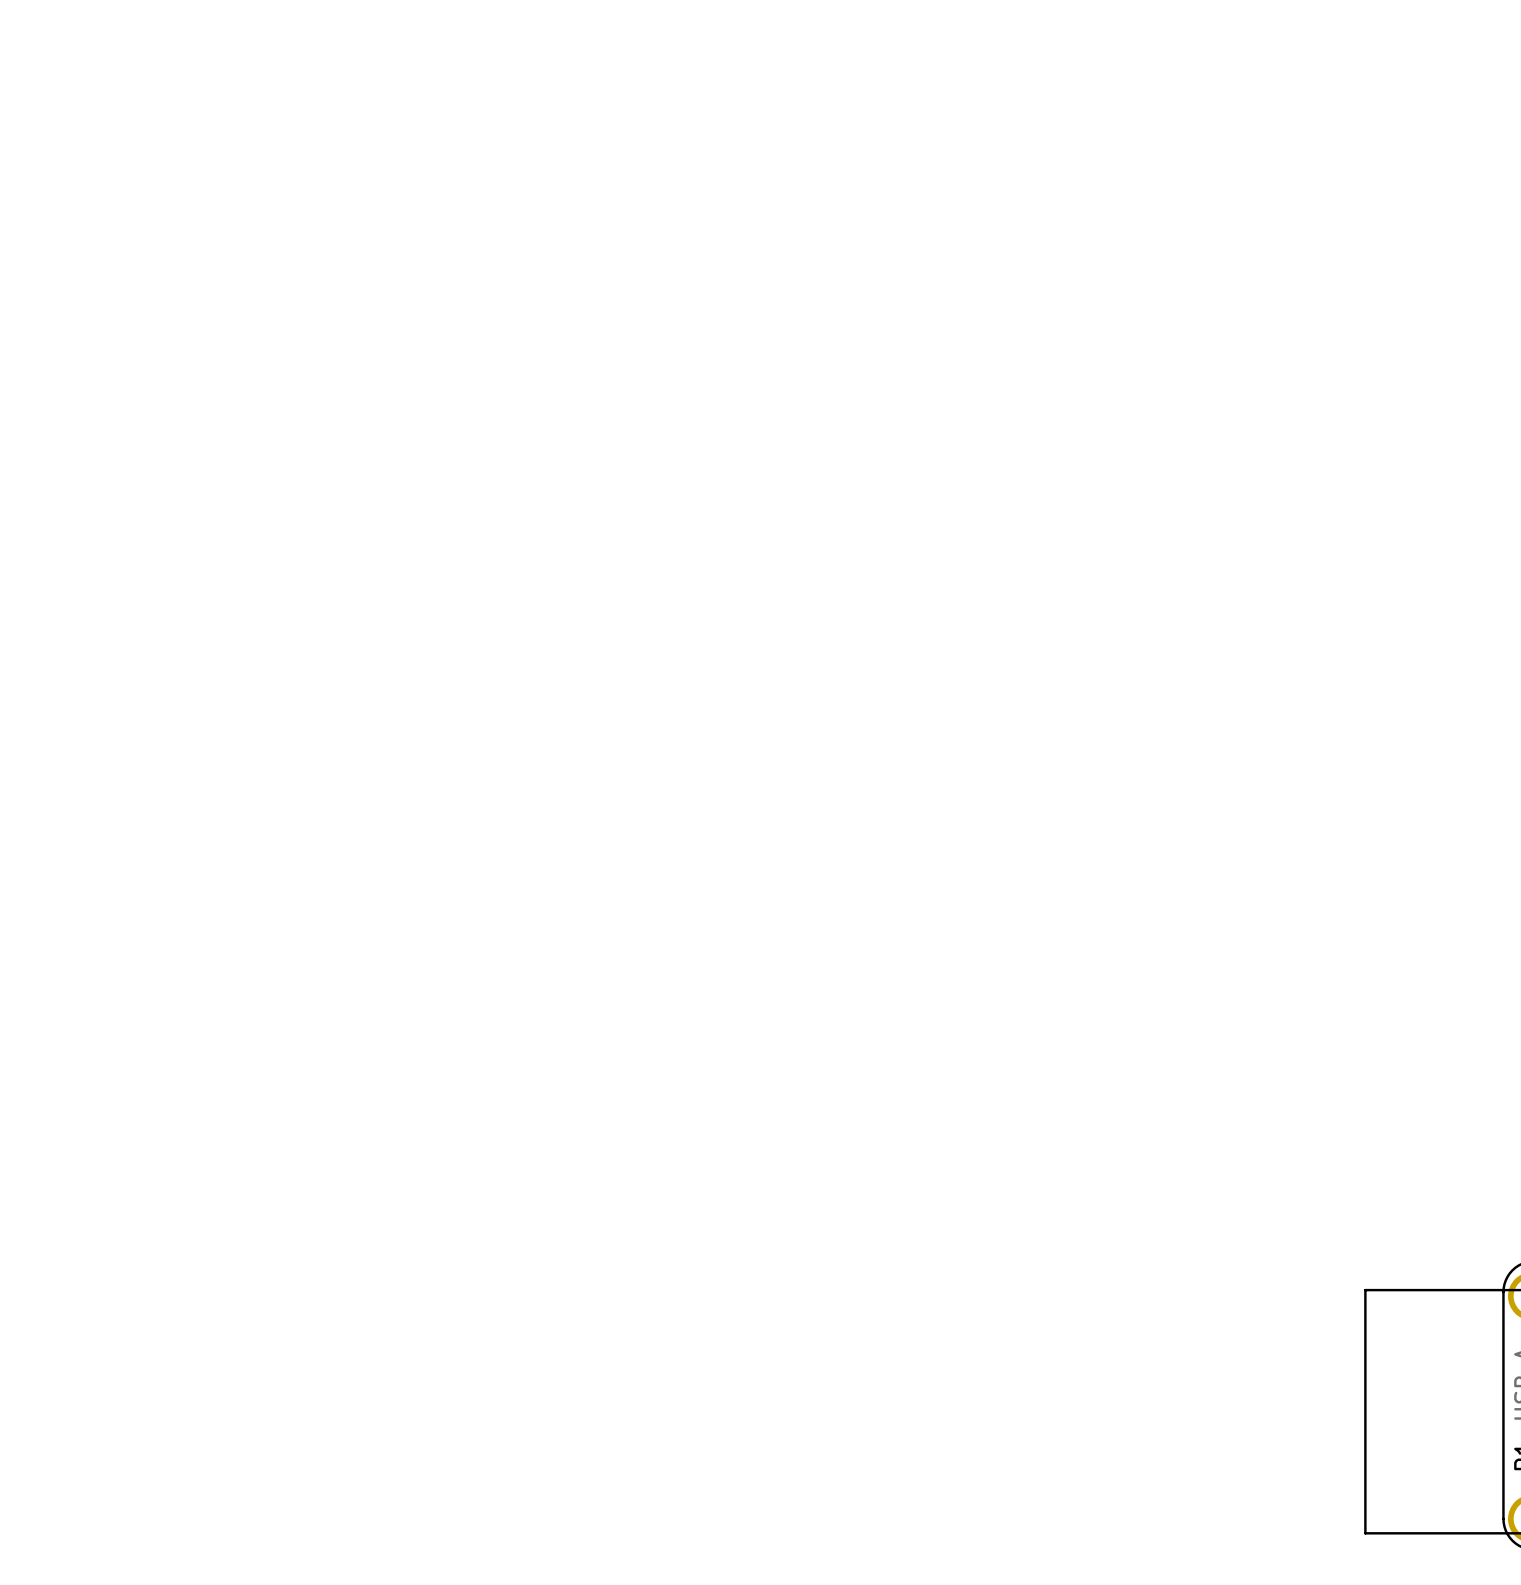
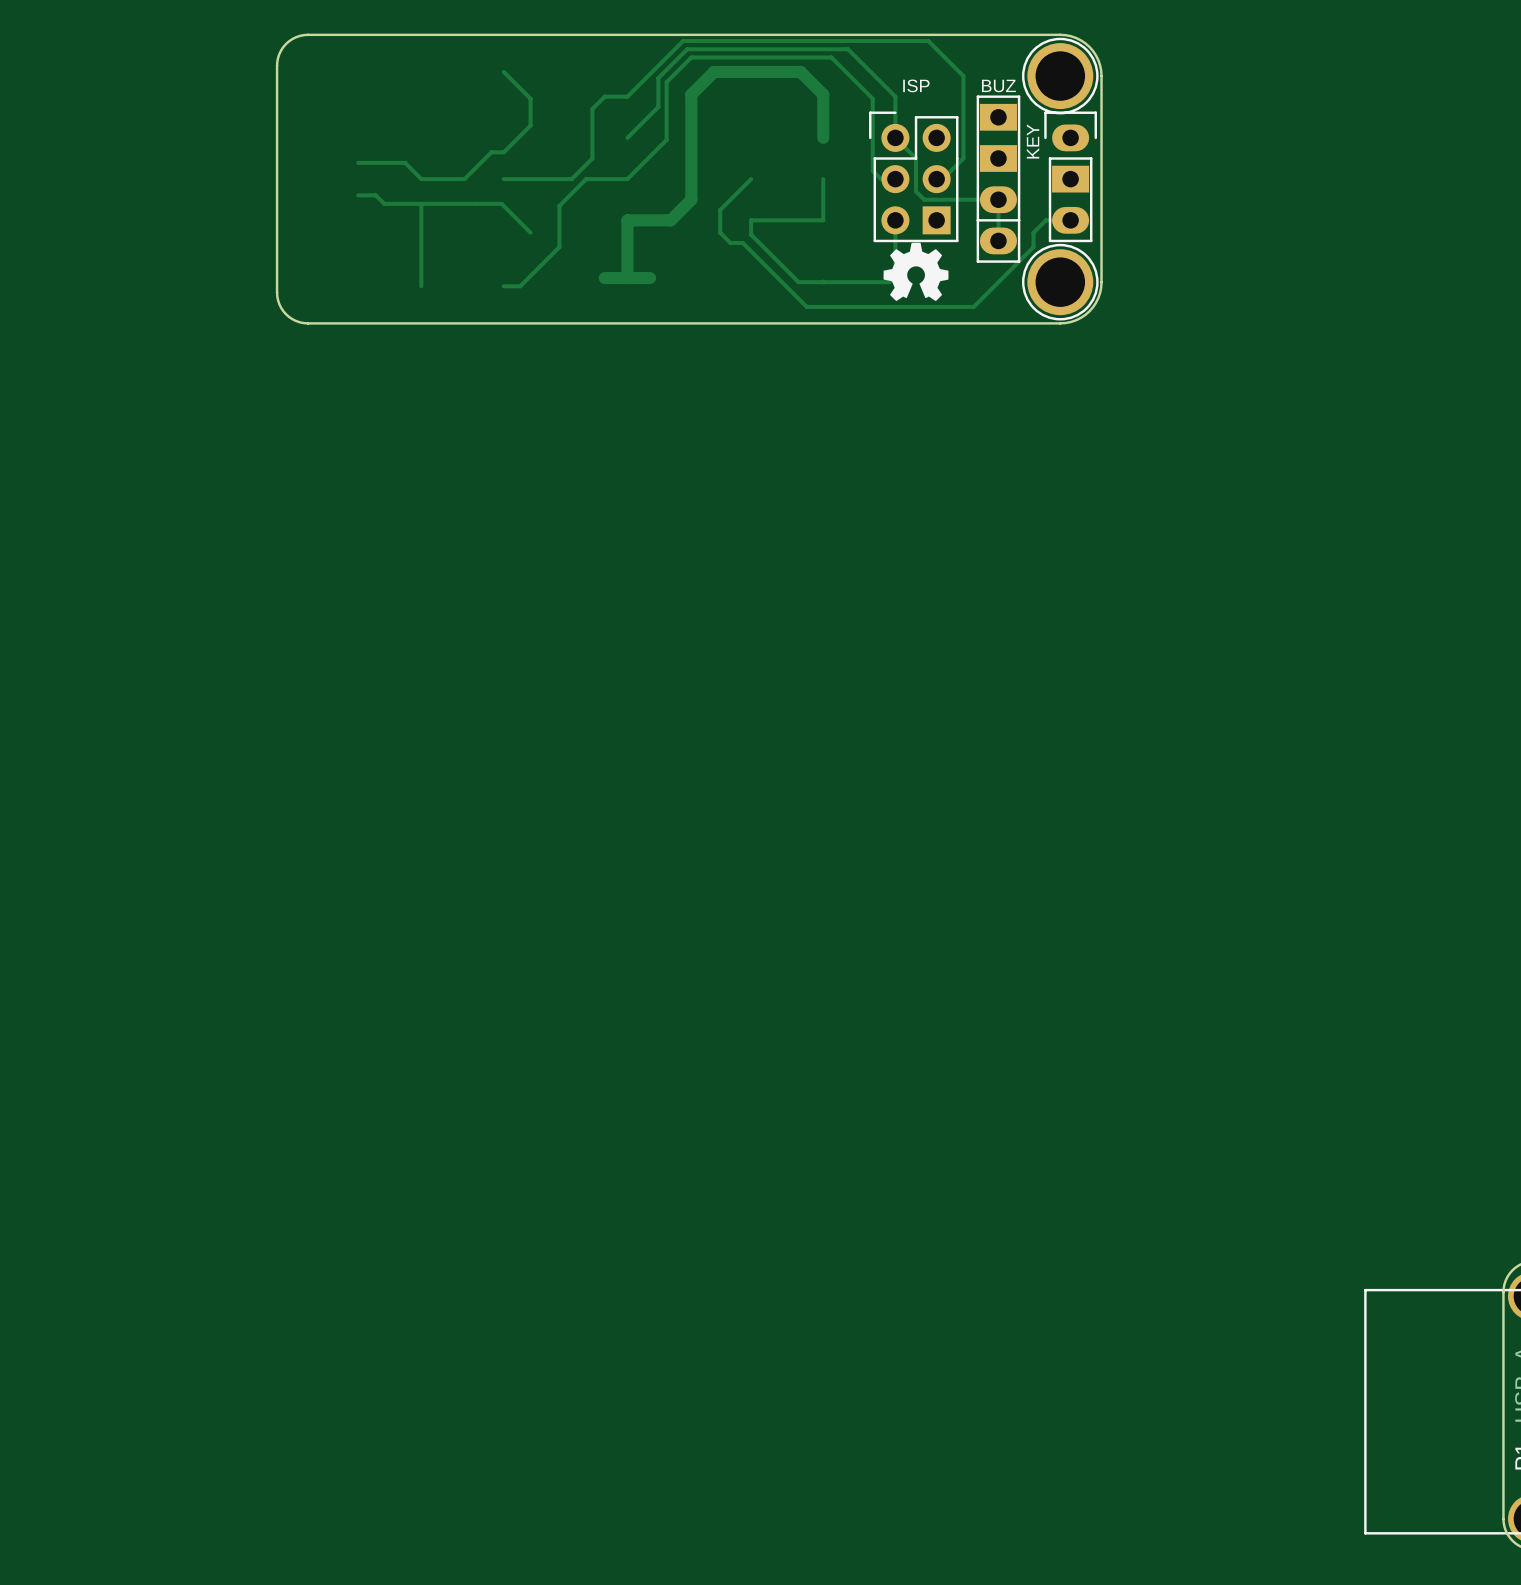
board edge: none -> (307, 34) (1070, 36) (1080, 40) (1093, 50) (1101, 70) (1100, 292) (1093, 307) (1085, 314) (1076, 320) (1060, 323) (299, 322) (286, 314) (279, 304) (277, 296) (277, 65) (279, 53) (286, 43) (296, 37) (307, 34)
track: none -> (503, 71) (530, 98) (530, 125) (503, 152) (491, 152) (464, 179) (421, 179) (405, 162) (358, 162)
part: none -> (1060, 76)
track: none -> (627, 137) (658, 106) (658, 78) (687, 49) (848, 49) (895, 96) (895, 137) (916, 158) (916, 191) (924, 199) (998, 199) (998, 240)
track: none -> (823, 137) (823, 94) (800, 71) (714, 71) (691, 94) (691, 199) (670, 220) (627, 220) (627, 278)
part: none -> ISP (913, 176)
part: none -> KEY (1070, 176)
track: none -> (503, 179) (571, 179) (592, 158) (592, 109) (604, 96) (627, 96) (683, 41) (928, 41) (963, 76) (963, 158) (942, 179) (936, 179)
track: none -> (751, 179) (720, 210) (720, 232) (730, 243) (742, 243) (806, 306) (973, 306) (1033, 247) (1033, 232) (1045, 220) (1070, 220)
track: none -> (823, 179) (823, 220) (751, 220) (751, 234) (798, 282) (889, 282) (895, 275) (895, 220)
track: none -> (895, 179) (880, 179) (872, 170) (872, 98) (831, 57) (691, 57) (666, 82) (666, 139) (627, 179) (586, 179) (559, 205) (559, 247) (520, 286) (503, 286)
part: none -> BUZ (998, 179)
track: none -> (358, 195) (375, 195) (384, 203) (501, 203) (530, 232)
track: none -> (421, 203) (421, 286)
drawing: none -> [883, 242, 949, 302]
track: none -> (604, 278) (650, 278)
part: none -> (1060, 282)

